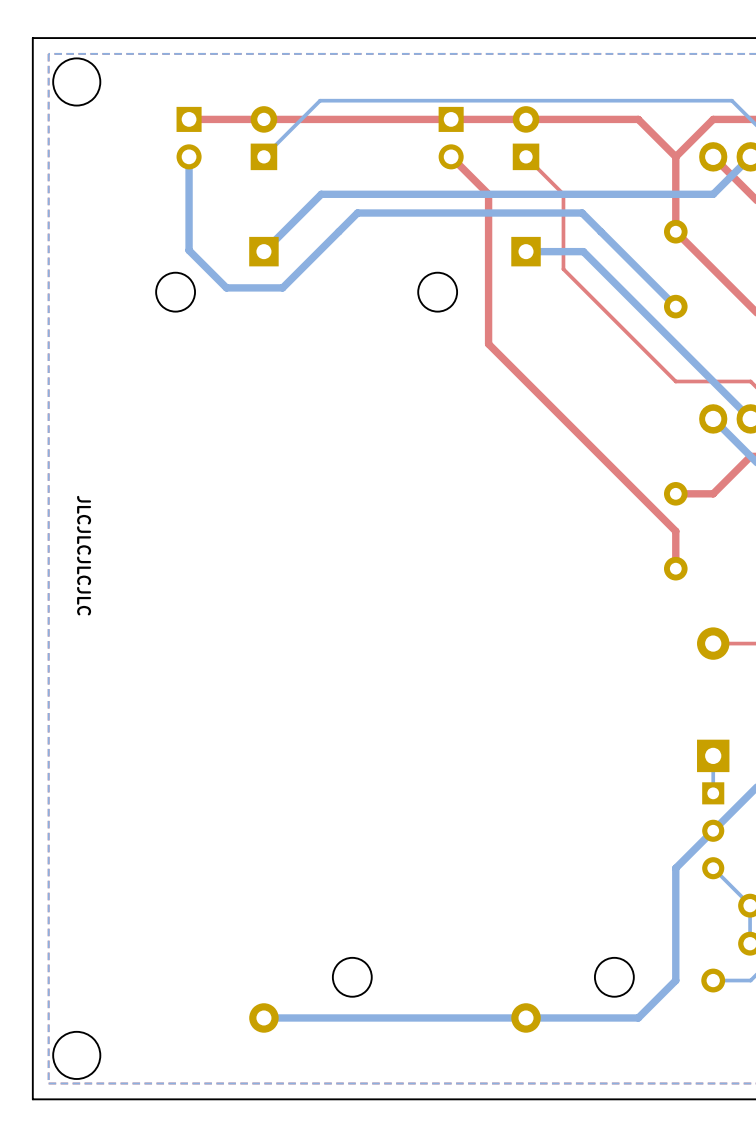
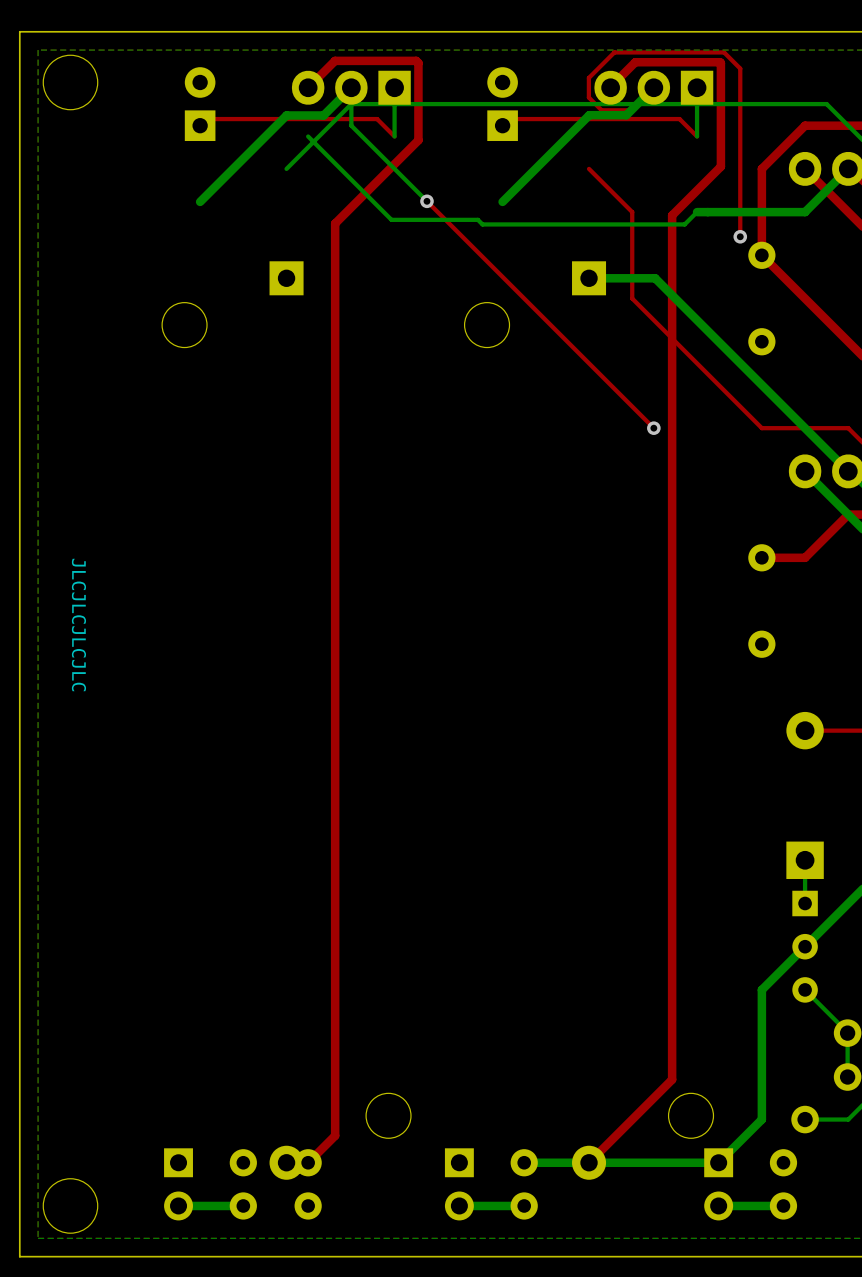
top track: none -> (308, 87) (335, 60) (416, 60) (418, 63) (418, 140) (335, 223) (335, 1135) (308, 1162)
part: none -> (351, 87)
bottom track: none -> (394, 87) (394, 136)
top track: none -> (610, 87) (635, 62) (720, 63) (720, 166) (672, 215) (672, 1079) (589, 1162)
bottom track: none -> (653, 87) (626, 115) (589, 115) (502, 201)
top track: none -> (653, 87) (631, 110) (601, 110) (588, 97) (588, 77) (614, 52) (724, 52) (740, 68) (740, 236)
part: none -> (653, 87)
bottom track: none -> (697, 87) (697, 136)
top track: (189, 119) (638, 119) (675, 156) -> (200, 125) (206, 119) (377, 119) (394, 136)
top track: none -> (502, 125) (509, 119) (679, 119) (697, 136)
part: (189, 138) -> none
part position: (263, 138) -> (200, 104)
part: (451, 138) -> none
part position: (526, 138) -> (502, 104)
bottom track: (189, 156) (189, 250) (226, 287) (282, 287) (357, 213) (582, 213) (675, 306) -> none
top track: (451, 156) (488, 194) (488, 344) (675, 531) (675, 568) -> none
bottom track: none -> (426, 201) (351, 125) (351, 87) (323, 115) (286, 115) (200, 201)
top track: none -> (426, 201) (653, 428)
via: none -> (426, 201)
bottom track: (619, 194) (321, 194) (263, 251) -> (697, 212) (684, 224) (482, 224) (477, 219) (391, 219) (308, 136)
via: none -> (740, 236)
via: none -> (653, 428)
bottom track: (469, 1017) (282, 1017) -> none
part: none -> (178, 1184)
part: none -> (243, 1184)
part: none -> (308, 1184)
part: none -> (459, 1184)
part: none -> (524, 1184)
part: none -> (718, 1184)
part: none -> (783, 1184)
bottom track: none -> (243, 1205) (178, 1205)
bottom track: none -> (524, 1205) (459, 1205)
bottom track: none -> (783, 1205) (718, 1205)

